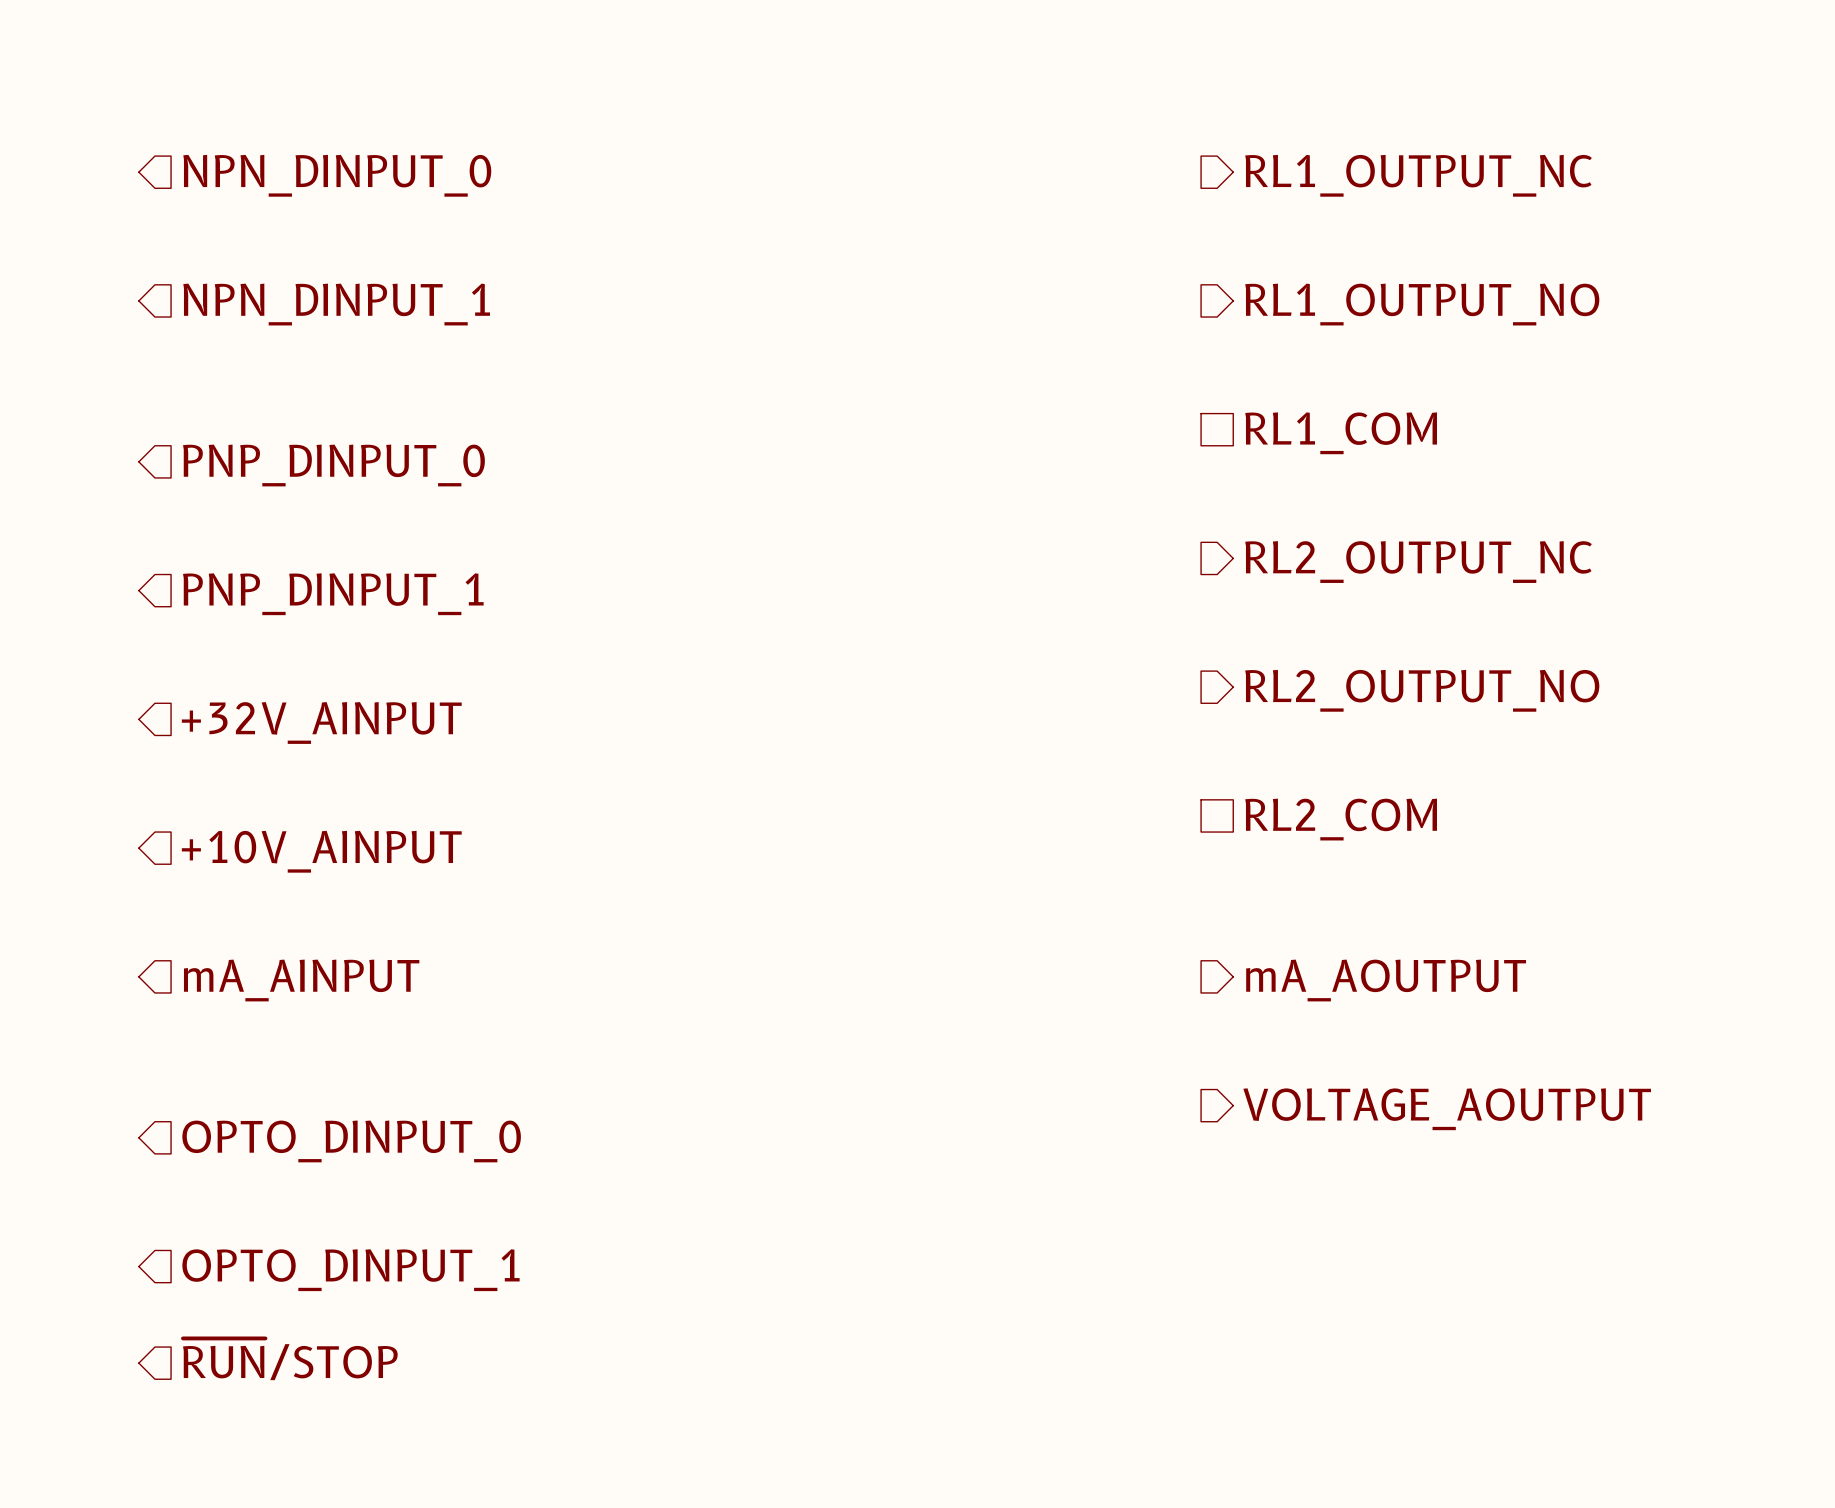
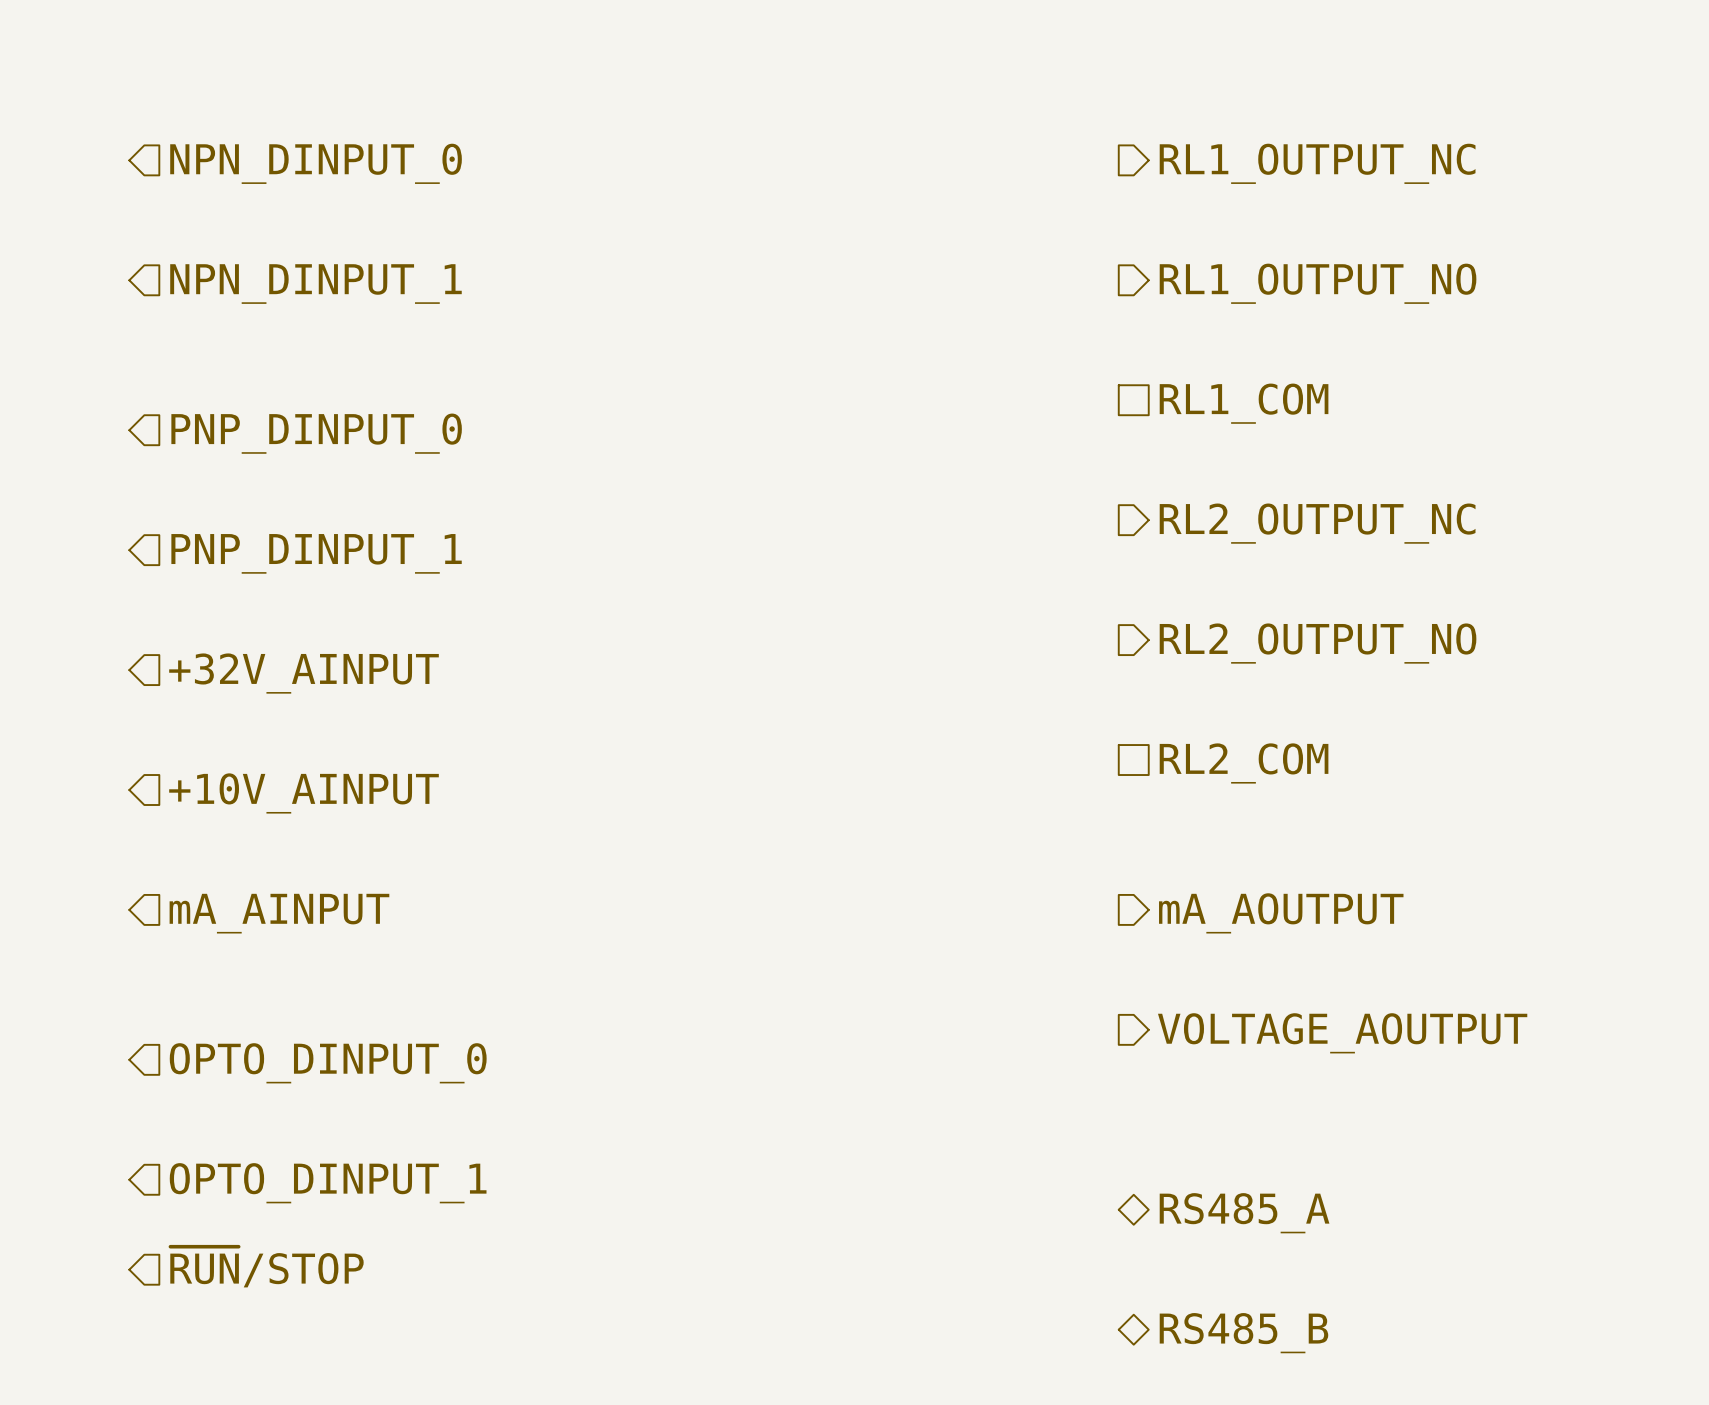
hierarchical label: none -> RS485_A (1244, 1213)
hierarchical label: none -> RS485_B (1243, 1333)

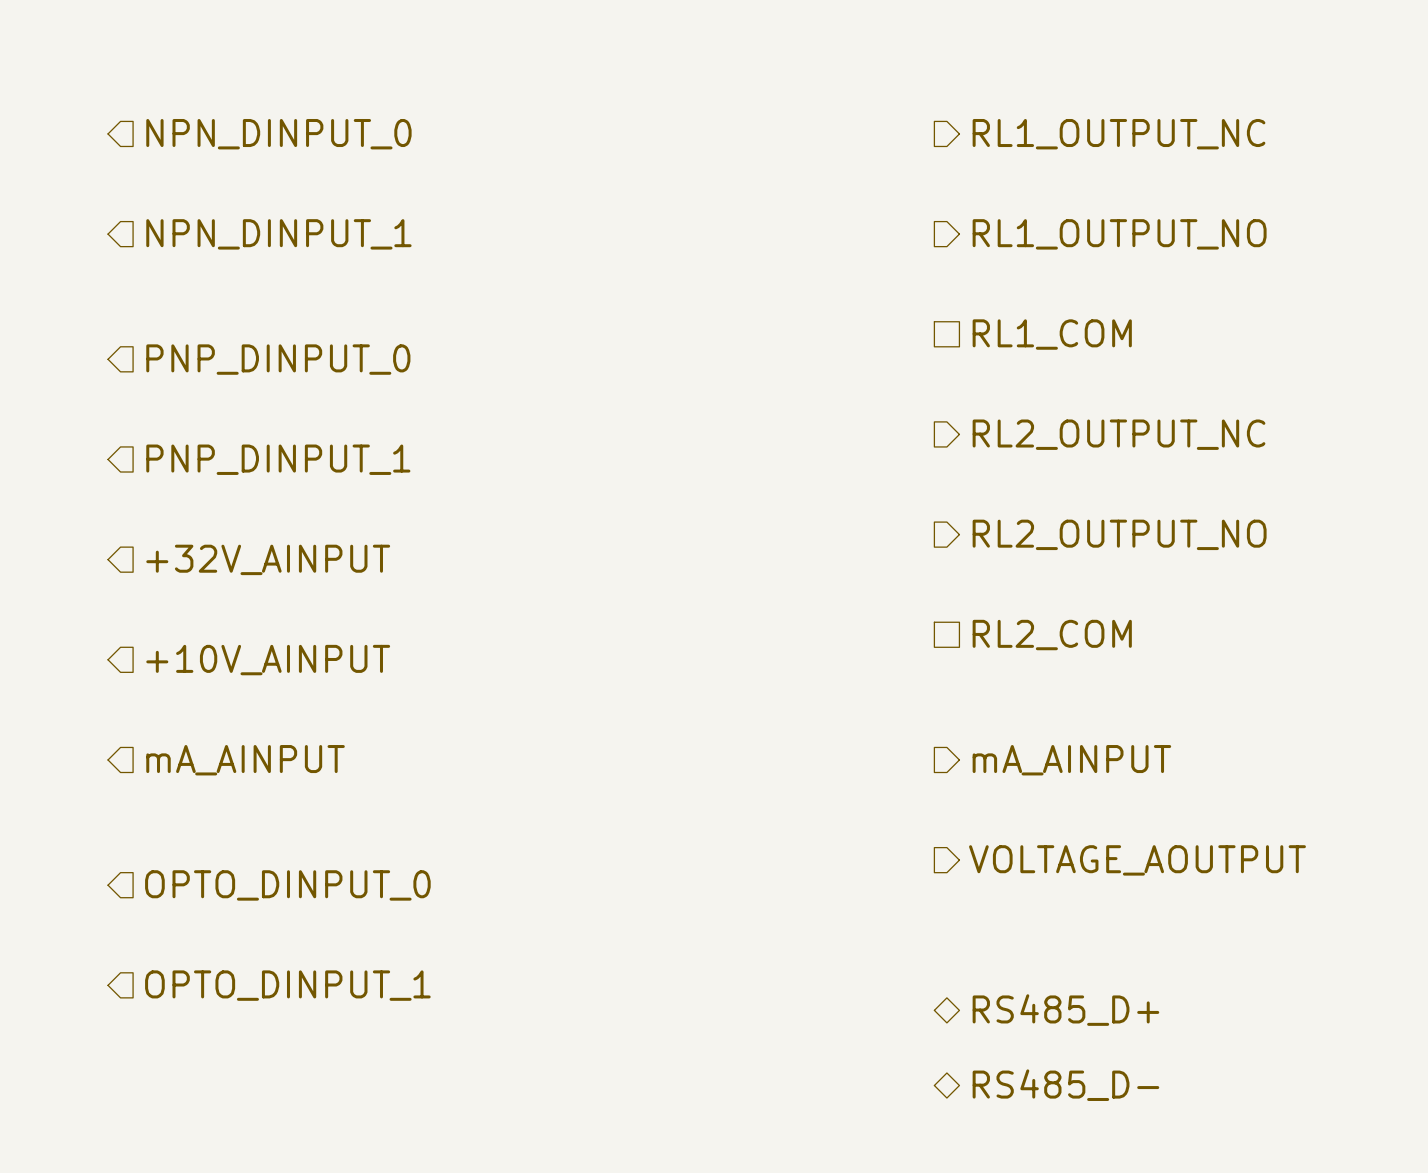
hierarchical label: mA_AOUTPUT (1281, 913) -> mA_AINPUT (1071, 760)
hierarchical label: RS485_A (1244, 1213) -> RS485_D+ (1065, 1010)
hierarchical label: ~{RUN}/STOP (266, 1267) -> none
hierarchical label: RS485_B (1243, 1333) -> RS485_D- (1065, 1085)

